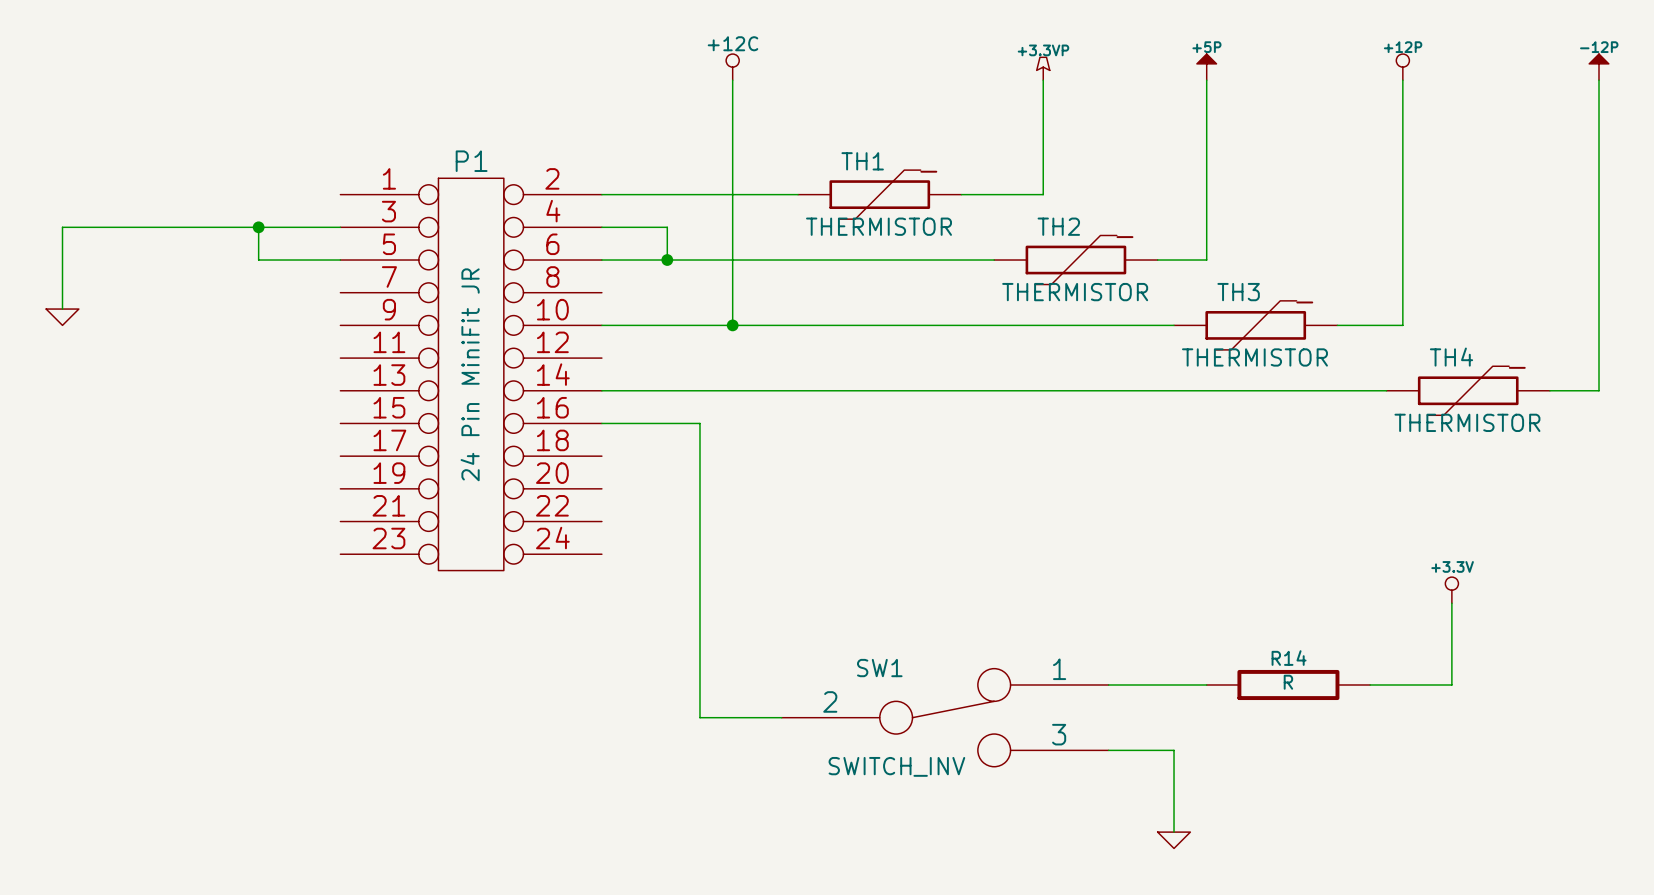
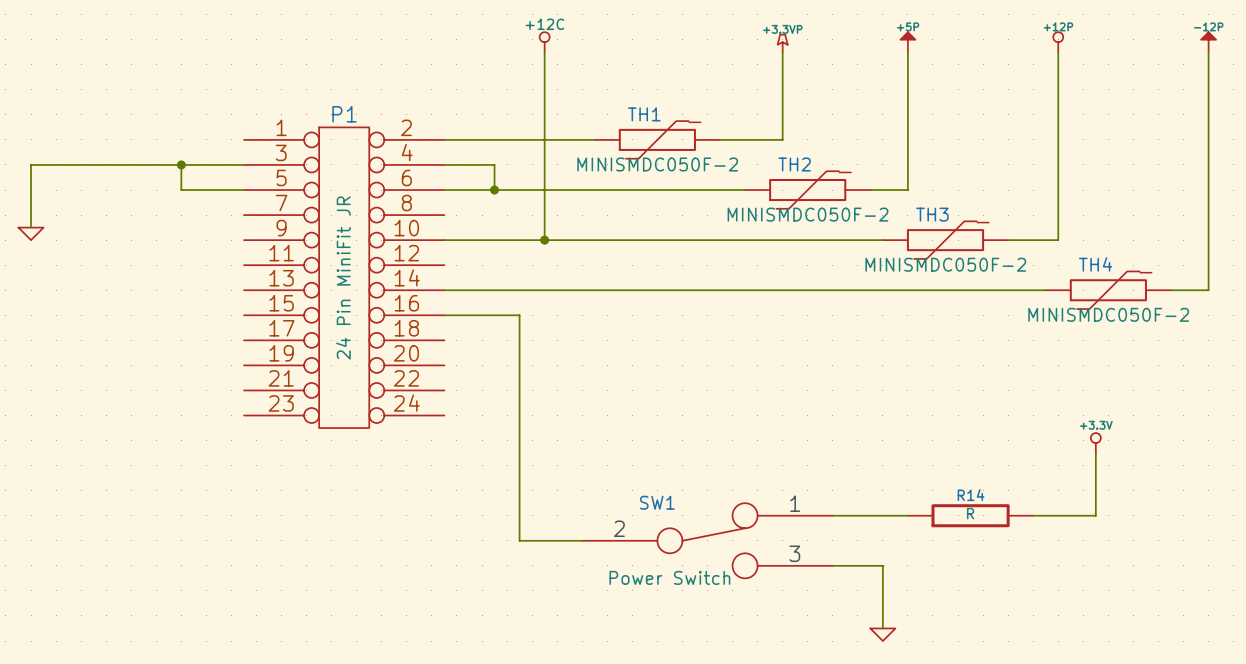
TH1 value: THERMISTOR (879, 226) -> MINISMDC050F-2 (657, 164)
TH2 value: THERMISTOR (1075, 292) -> MINISMDC050F-2 (808, 214)
TH3 value: THERMISTOR (1254, 357) -> MINISMDC050F-2 (945, 264)
TH4 value: THERMISTOR (1467, 422) -> MINISMDC050F-2 (1108, 314)
SW1 value: SWITCH_INV (896, 766) -> Power Switch (669, 577)

